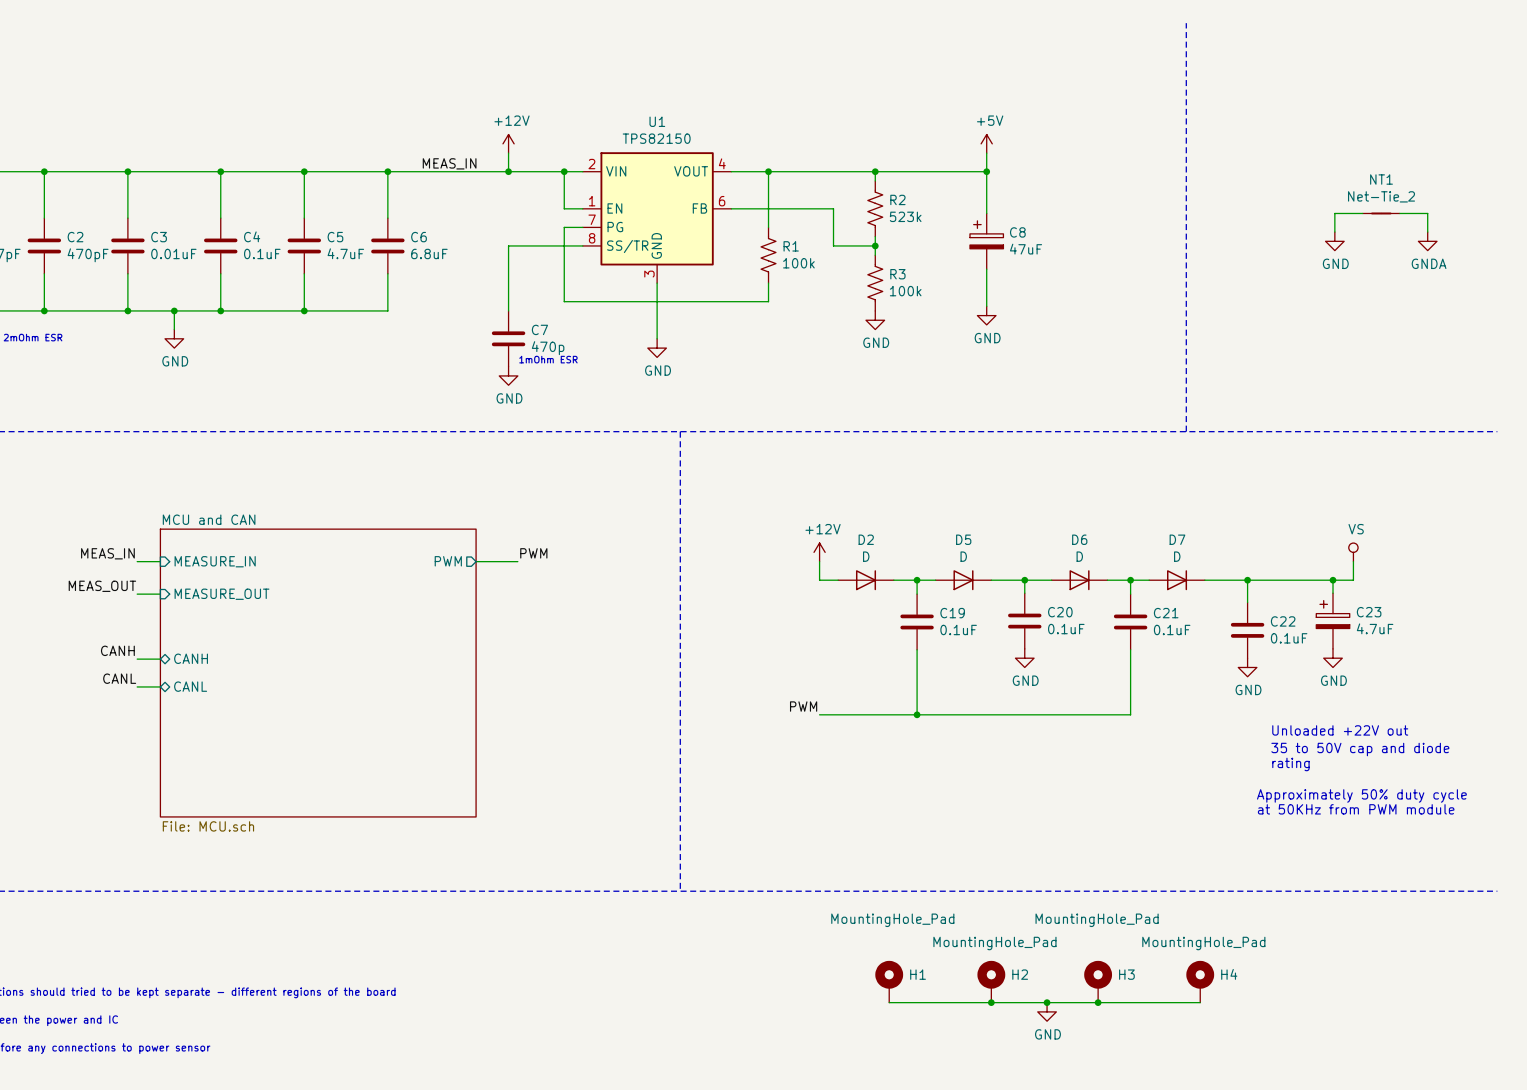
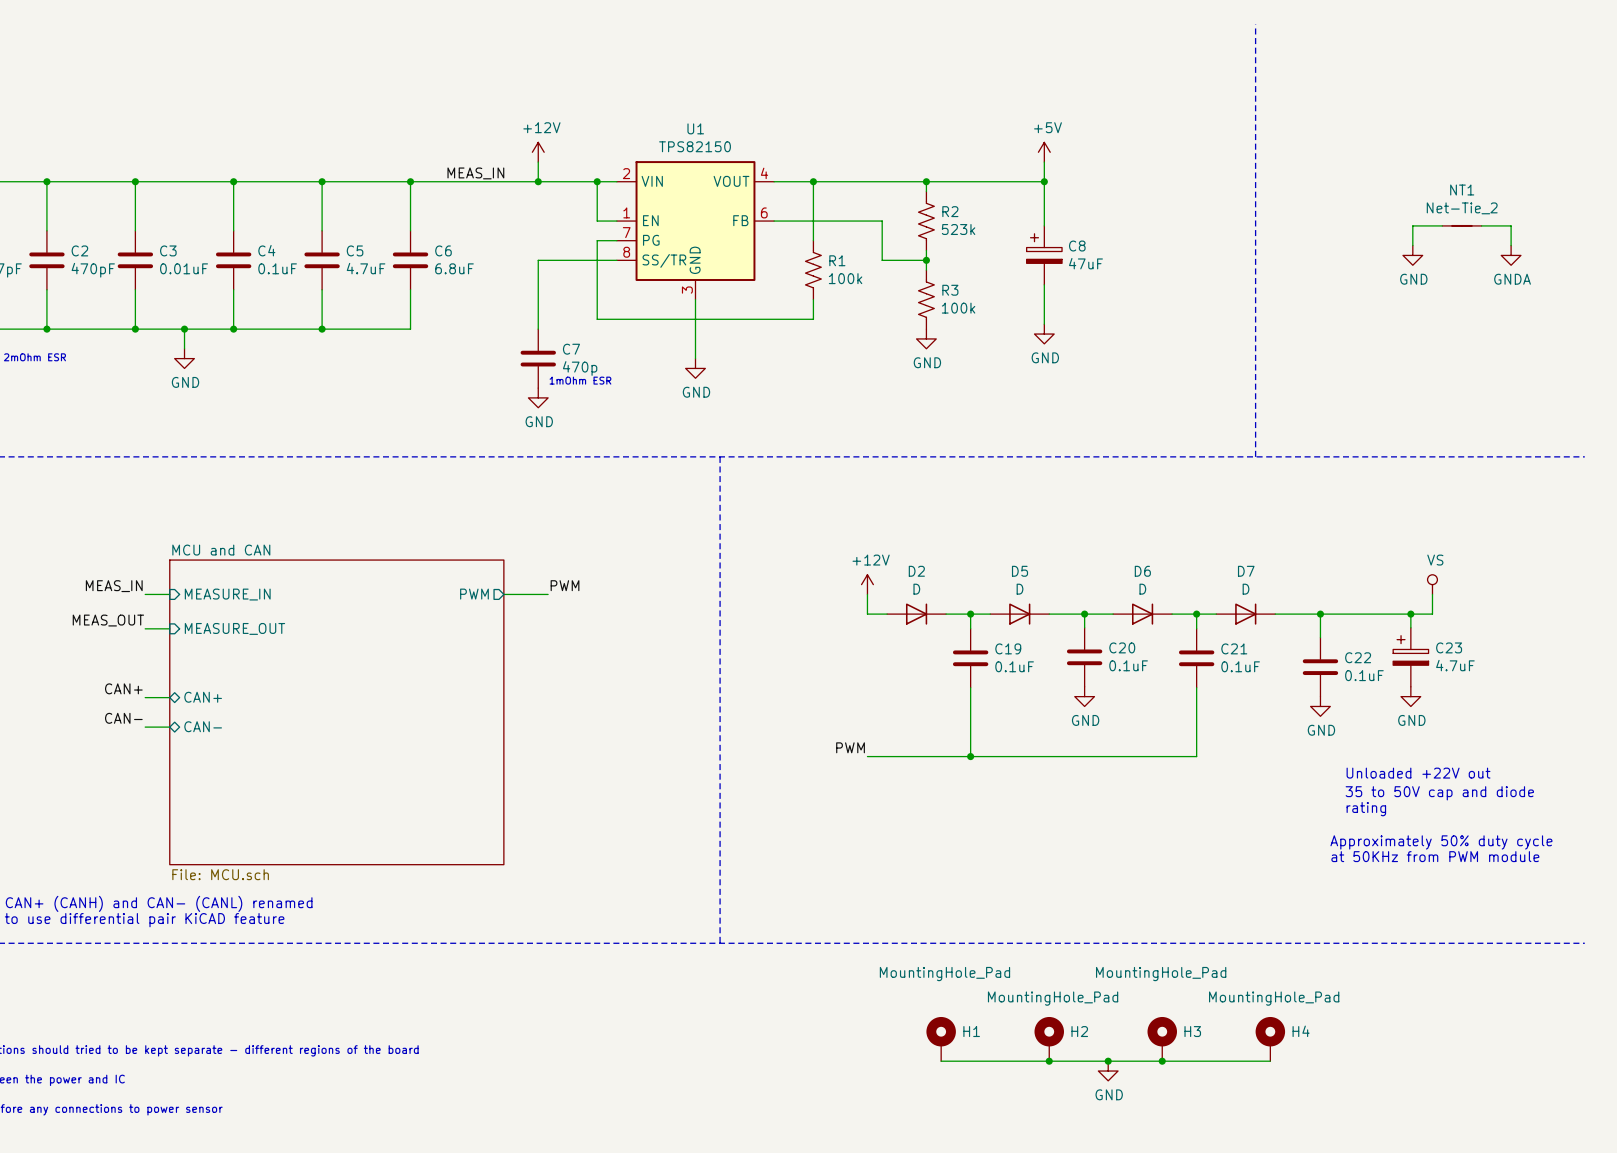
label: CANH (117, 650) -> CAN+ (123, 688)
sheet pin: CANH (191, 658) -> CAN+ (203, 697)
label: CANL (119, 678) -> CAN- (123, 718)
sheet pin: CANL (190, 686) -> CAN- (203, 726)
text: none -> CAN+ (CANH) and CAN- (CANL) renamed (159, 903)
text: none -> to use differential pair KiCAD feature (144, 920)

